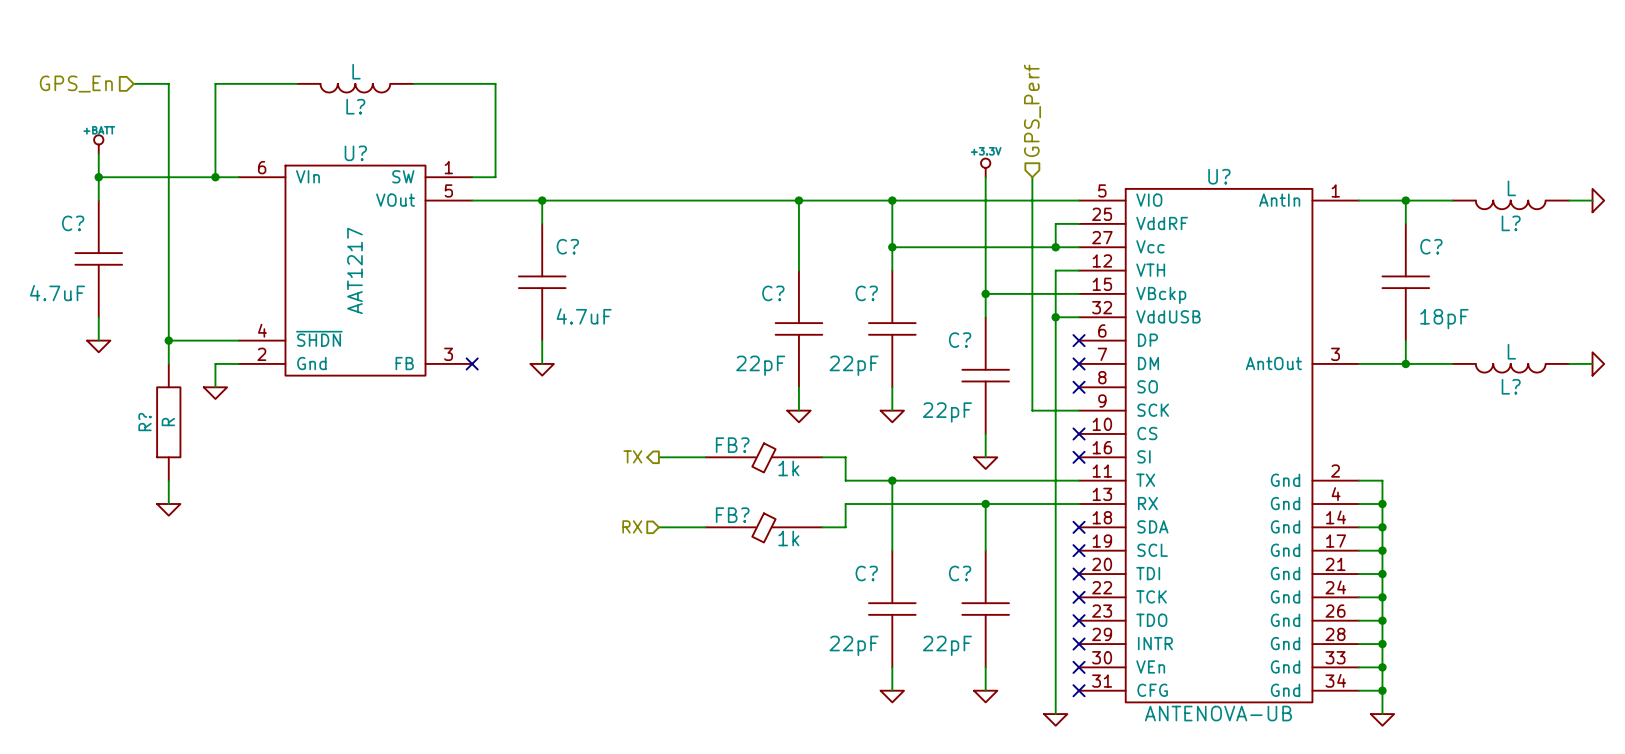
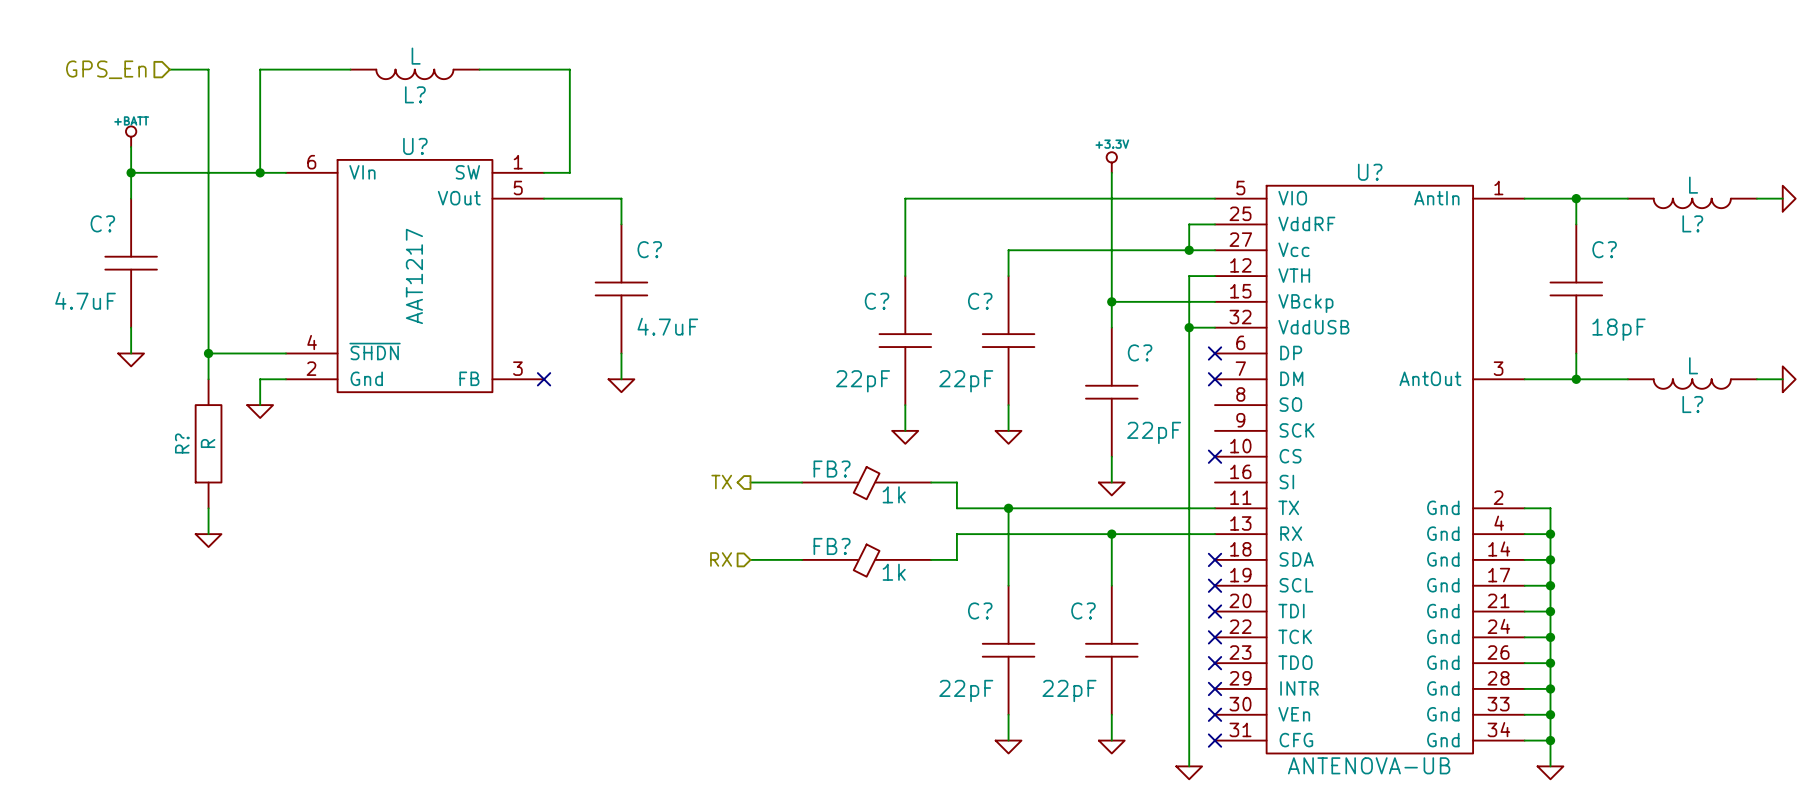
hierarchical label: GPS_Perf (1032, 110) -> none
wire: (1032, 177) (1032, 410) (1079, 410) -> none
wire: (542, 200) (798, 200) -> none
junction: (542, 200) -> none
junction: (798, 200) -> none
wire: (892, 200) (892, 247) -> none
junction: (892, 200) -> none
junction: (892, 247) -> none
C? name position: C? (960, 340) -> C? (1140, 352)
no-connect mark: (1079, 387) -> none
C? value position: 22pF (947, 412) -> 22pF (1154, 432)
no-connect mark: (1079, 457) -> none

